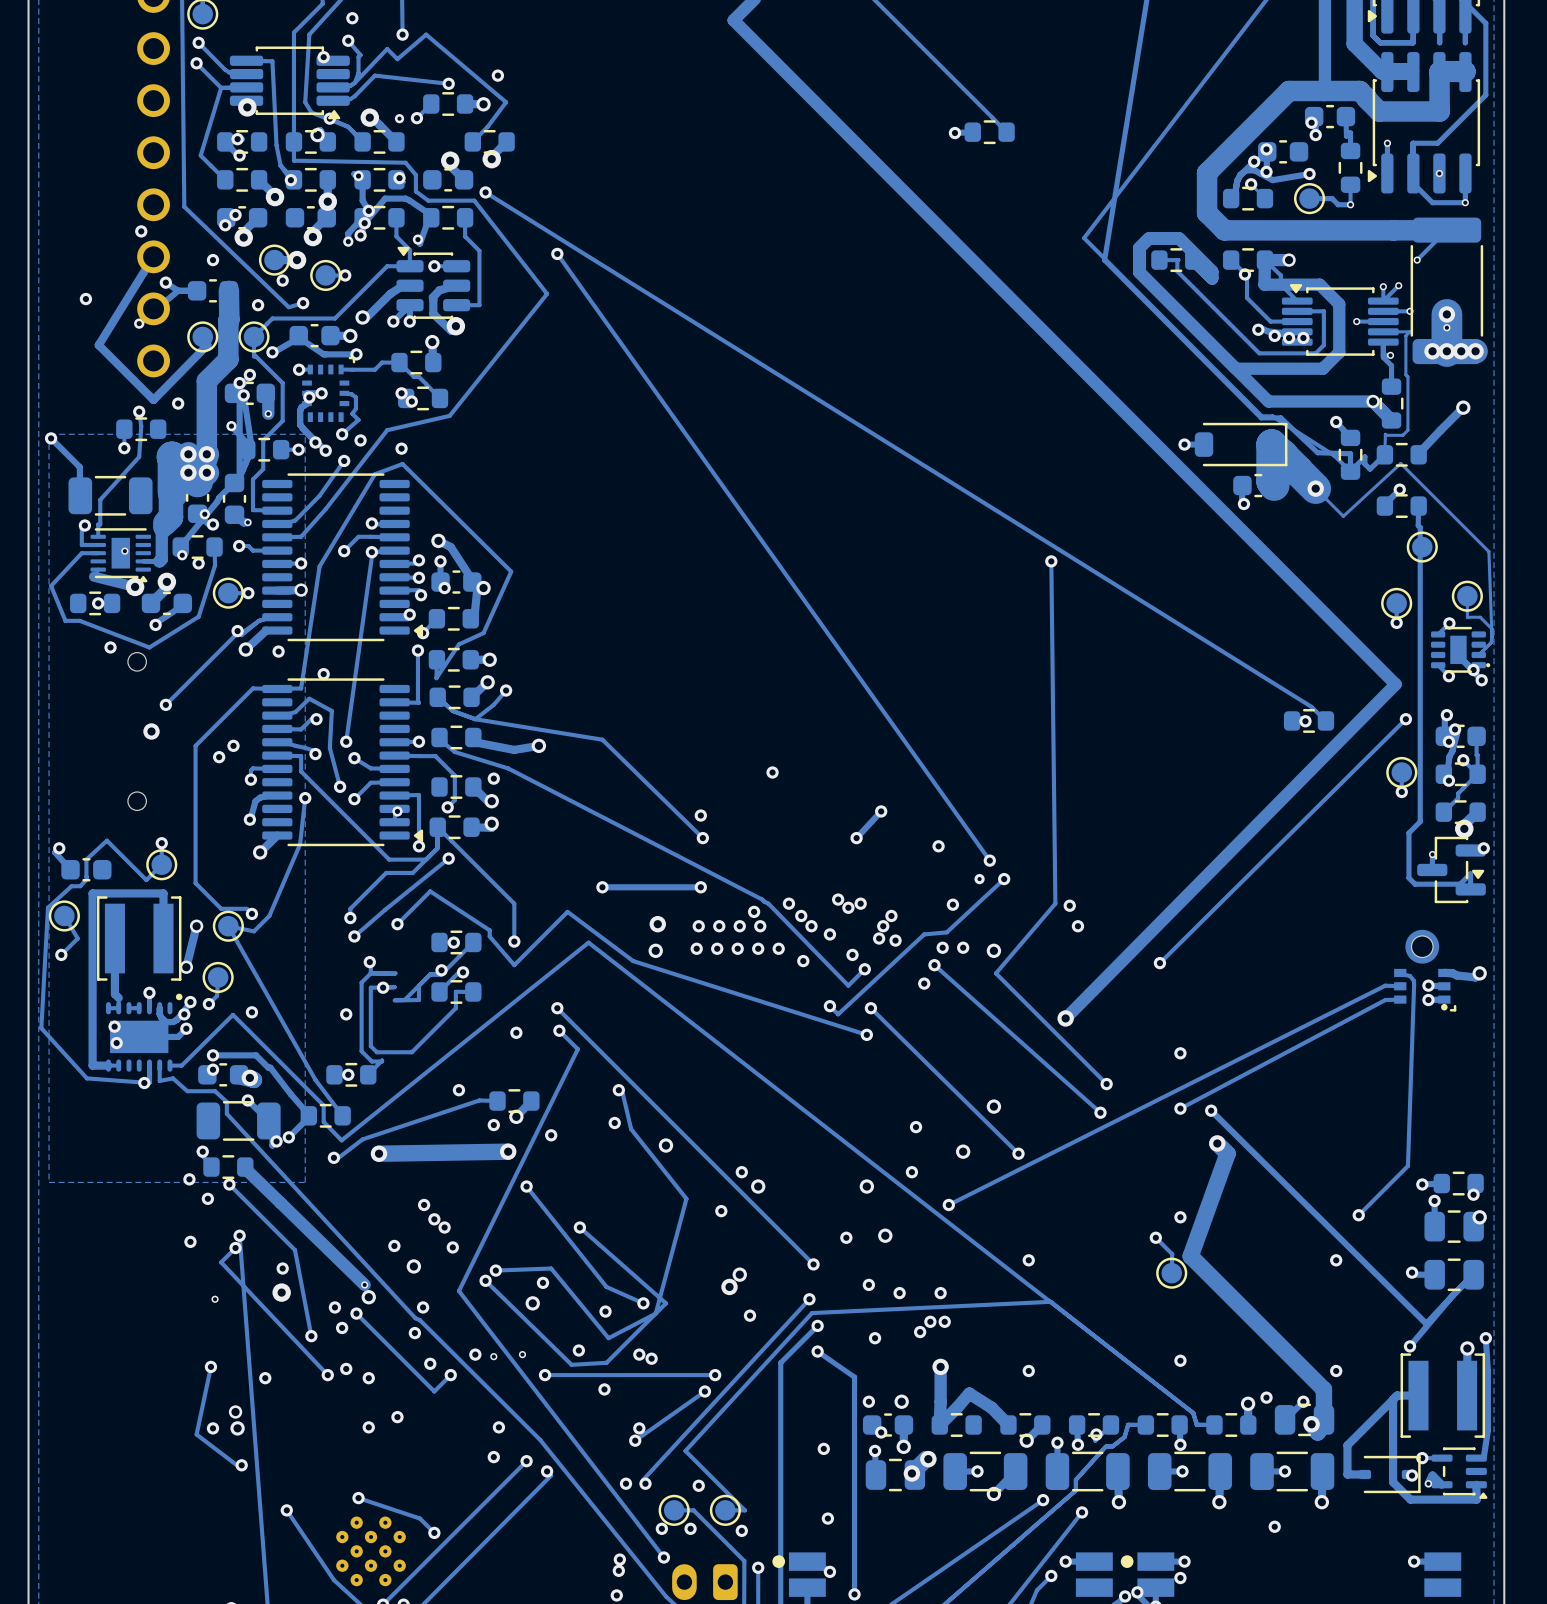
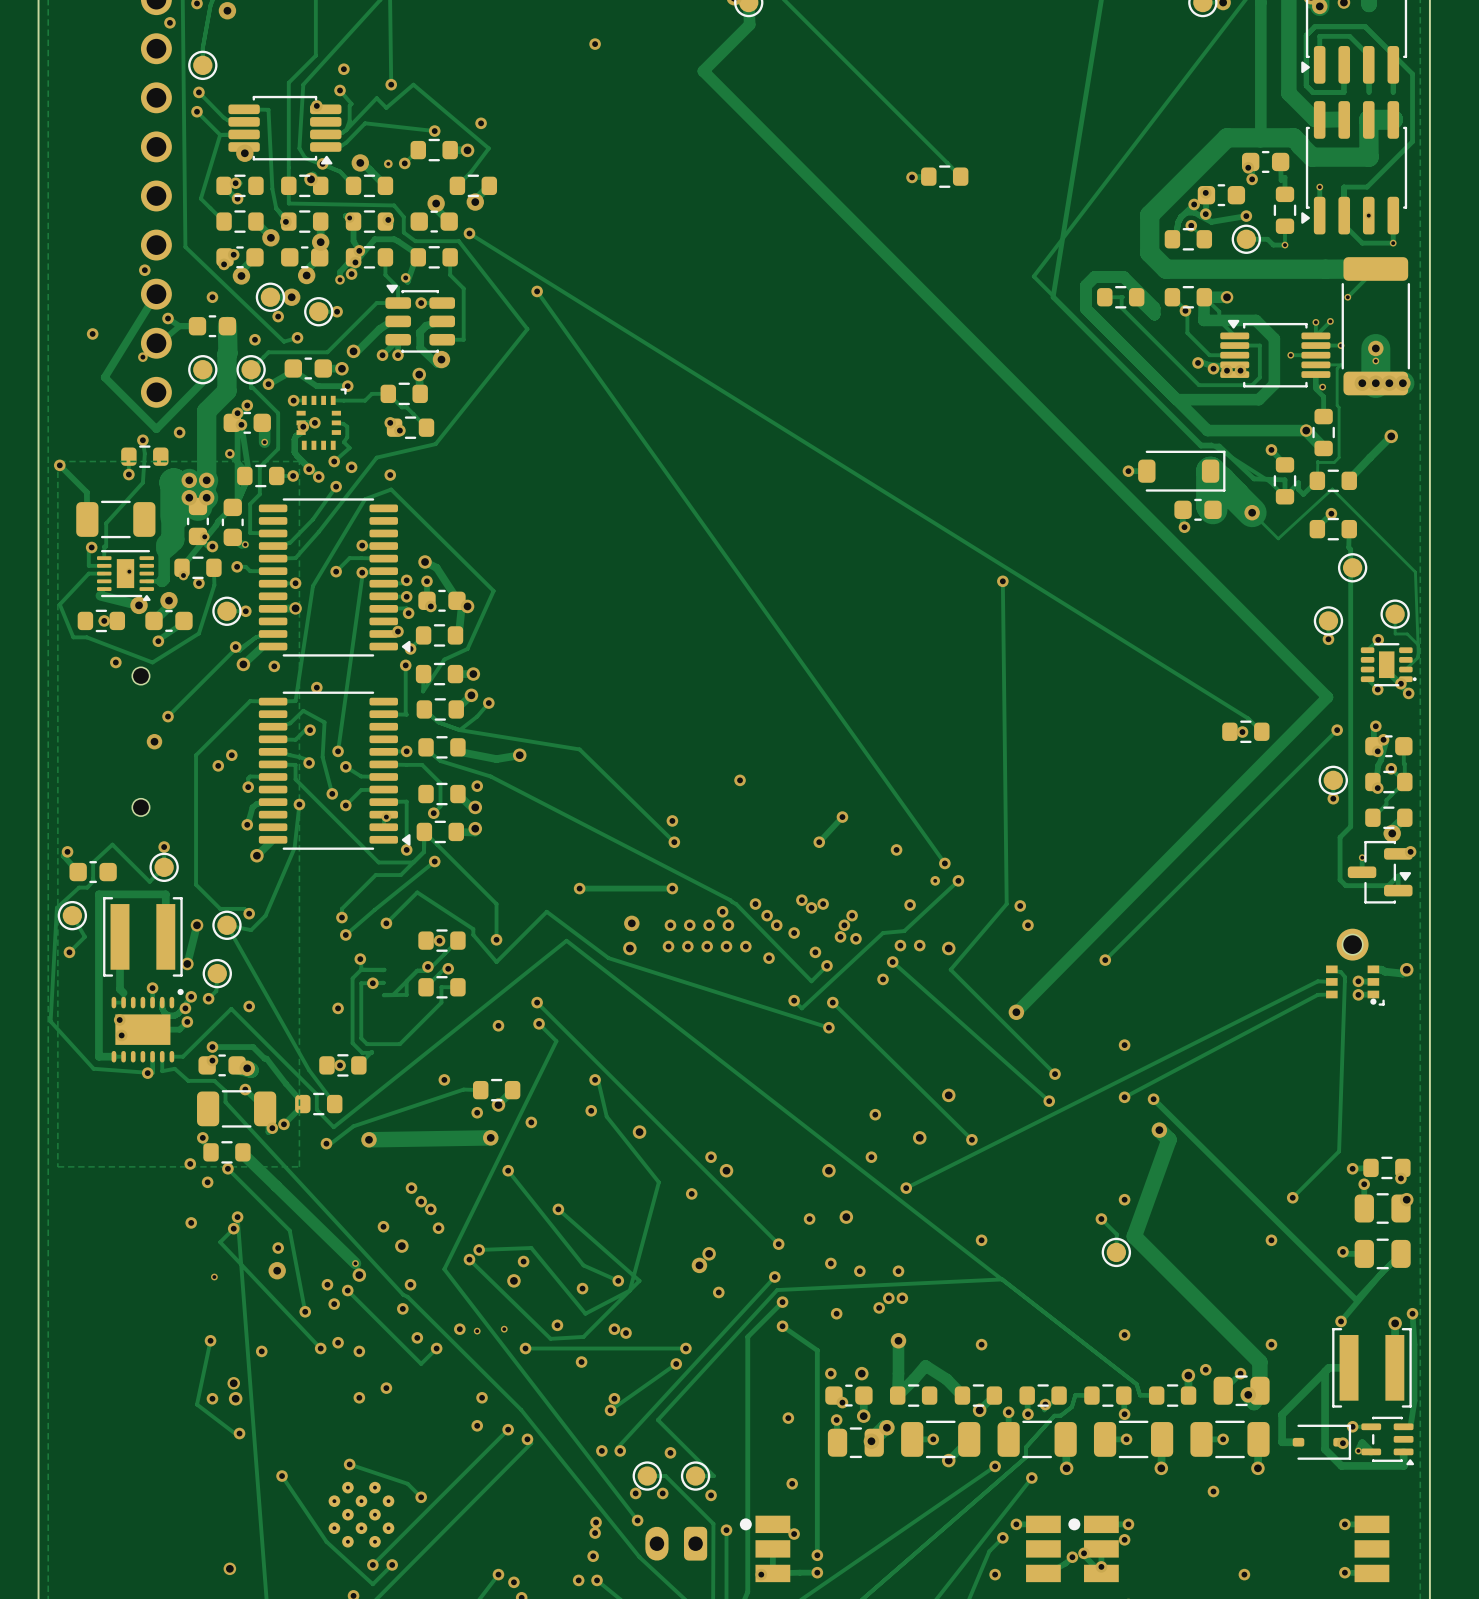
track: (139, 1008) (128, 1008) -> none

